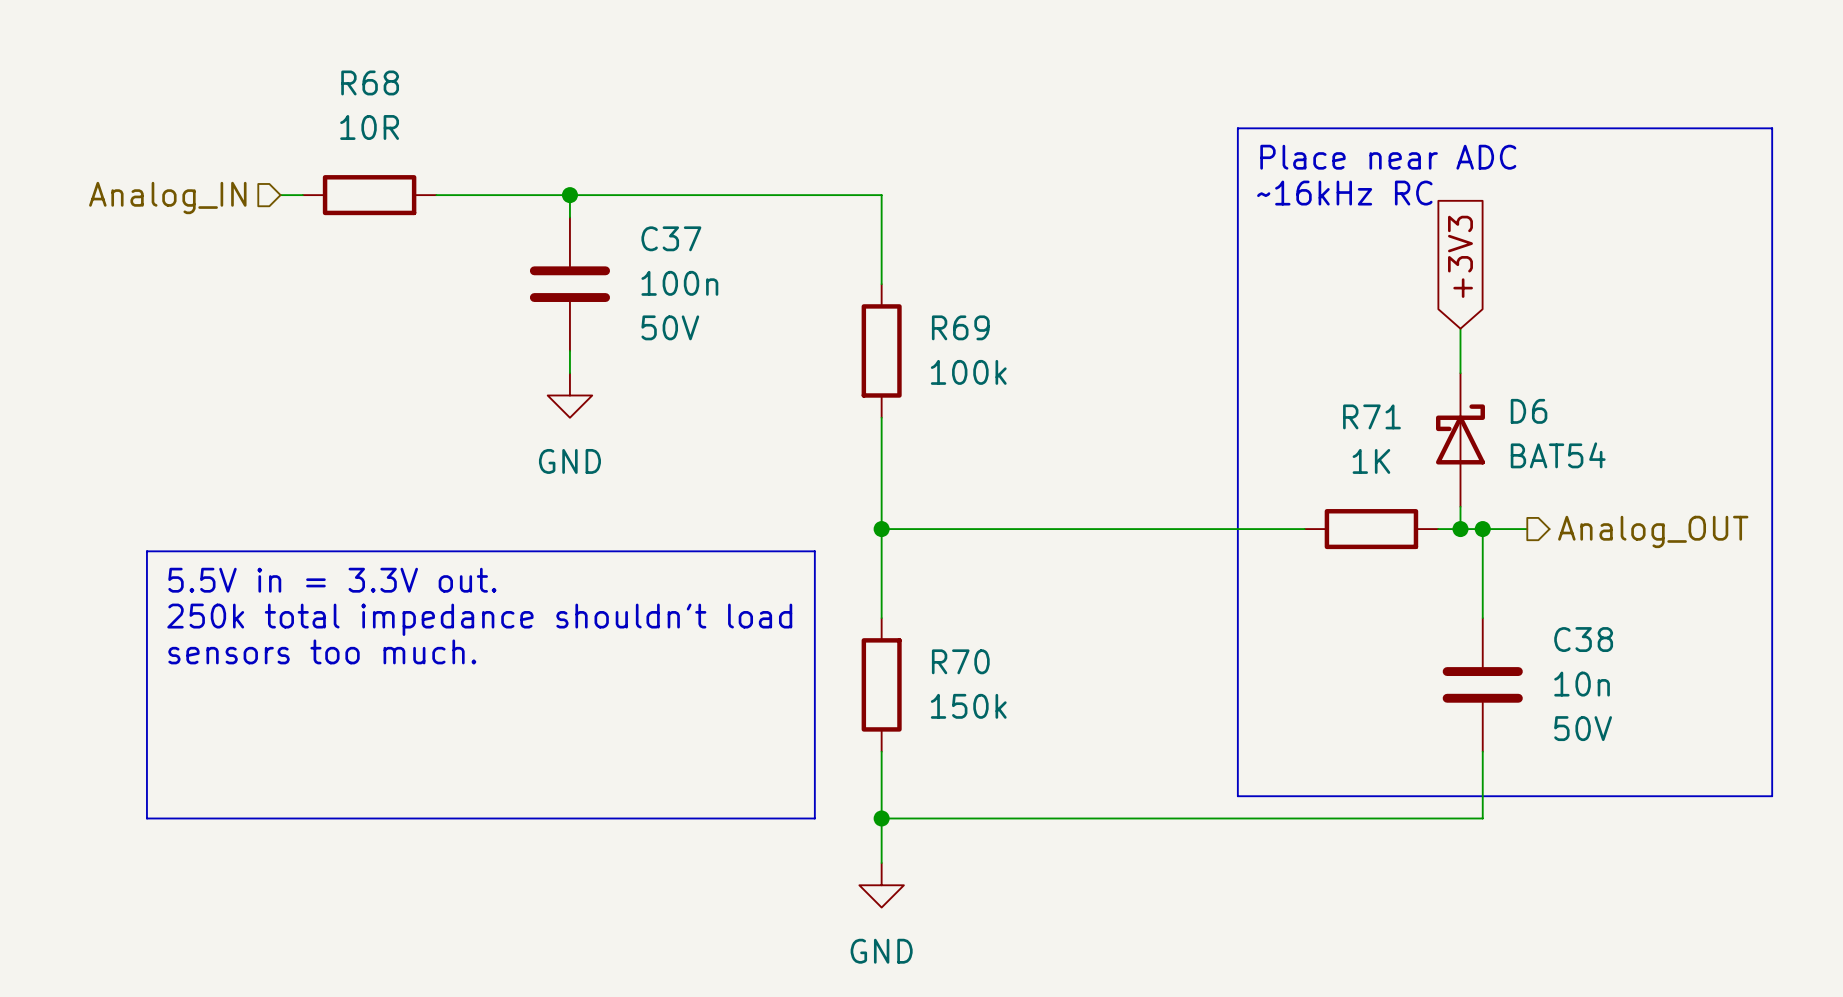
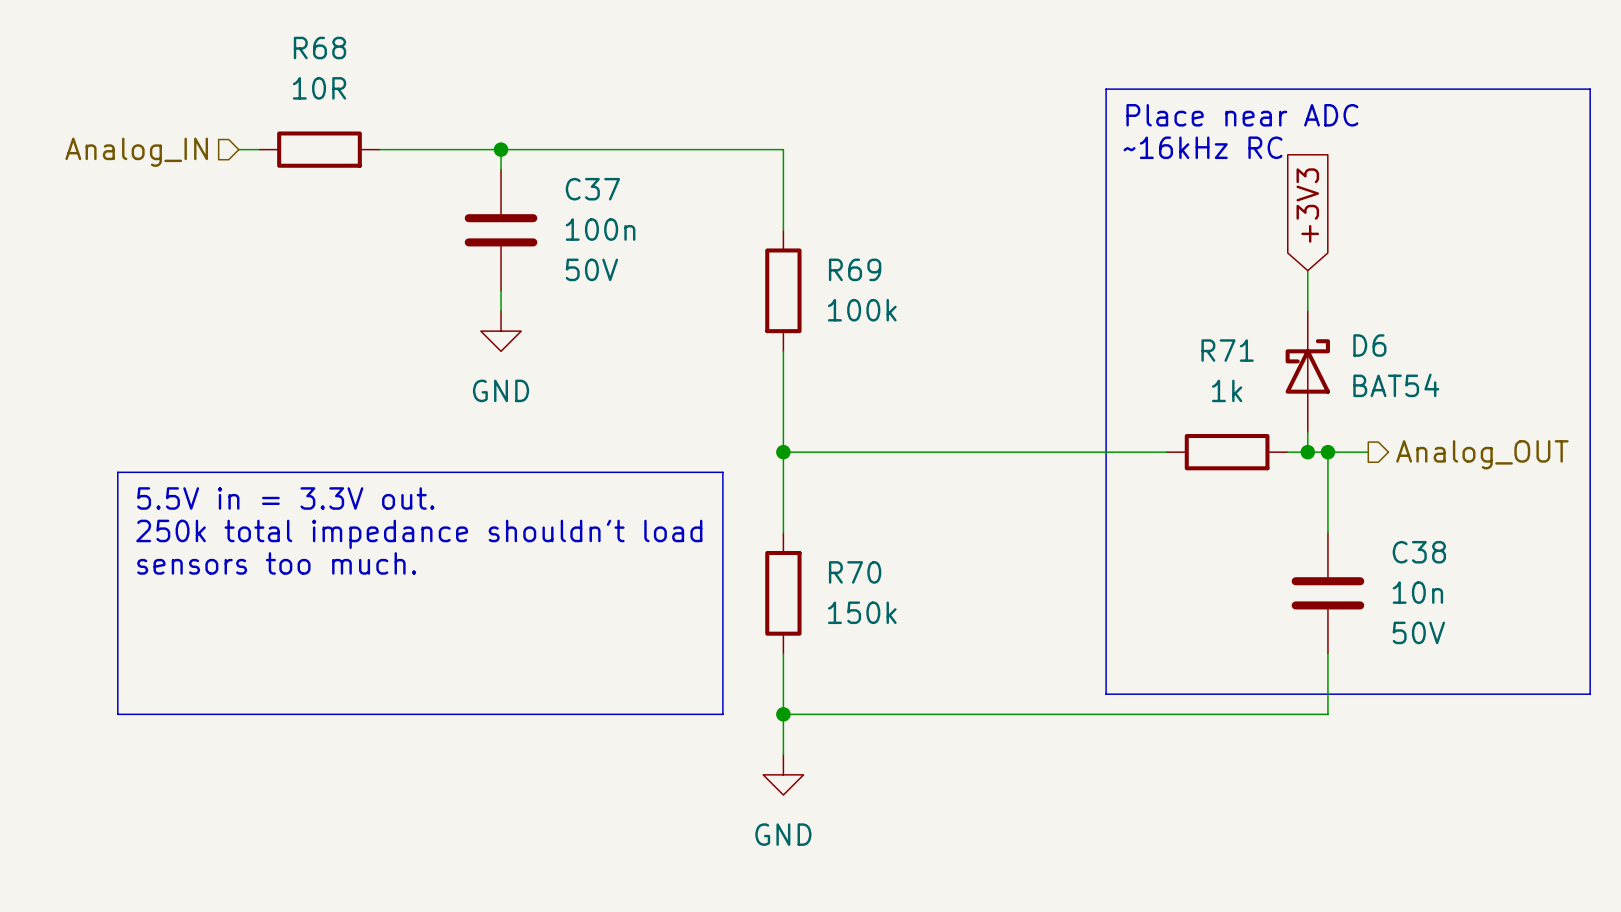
R71 value: 1K (1371, 461) -> 1k (1227, 390)

